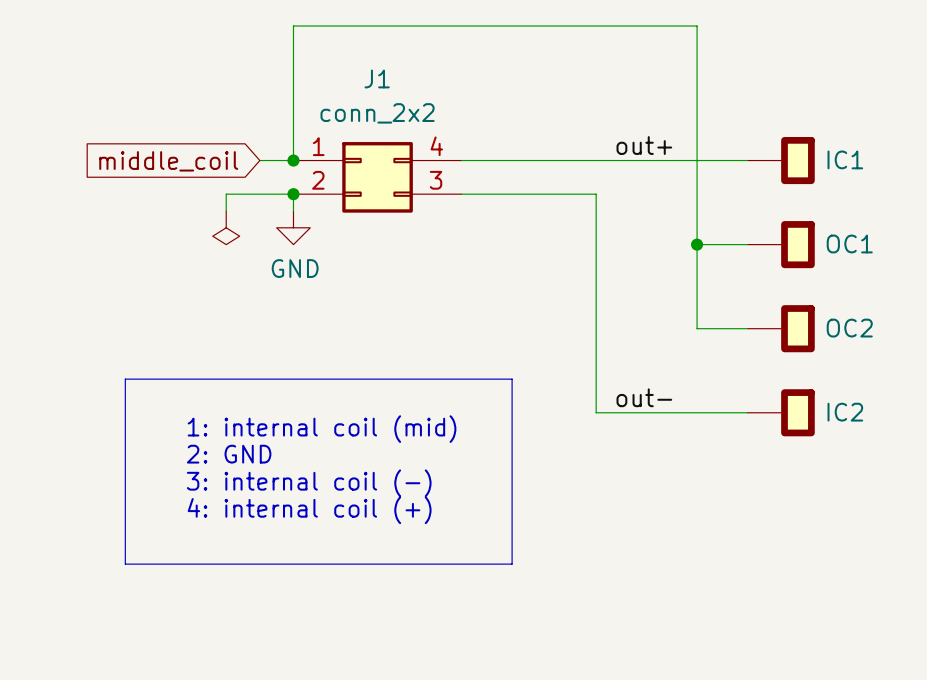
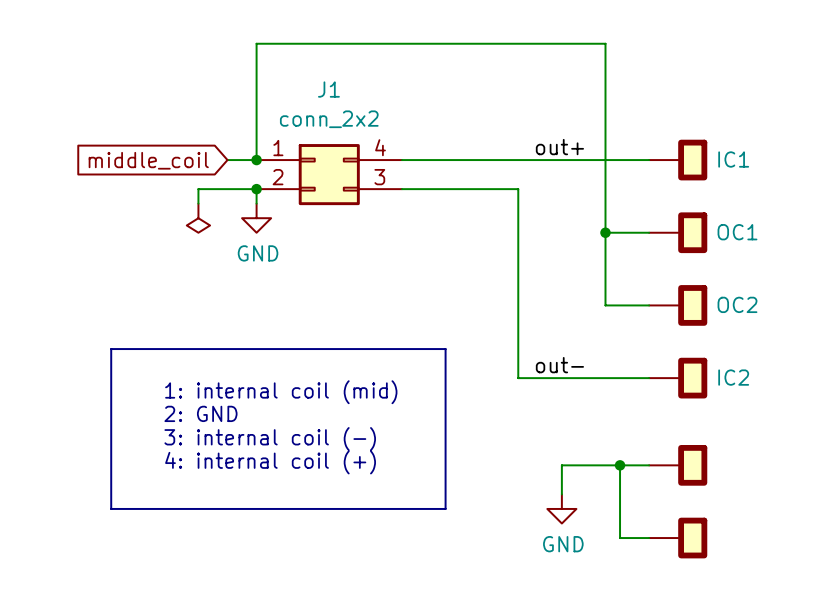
wire: none -> (620, 465) (620, 538) (649, 538)
junction: none -> (620, 465)
wire: none -> (649, 465) (561, 465) (561, 494)
part: none -> (678, 465)
power symbol: none -> GND (561, 508)
part: none -> (678, 538)

